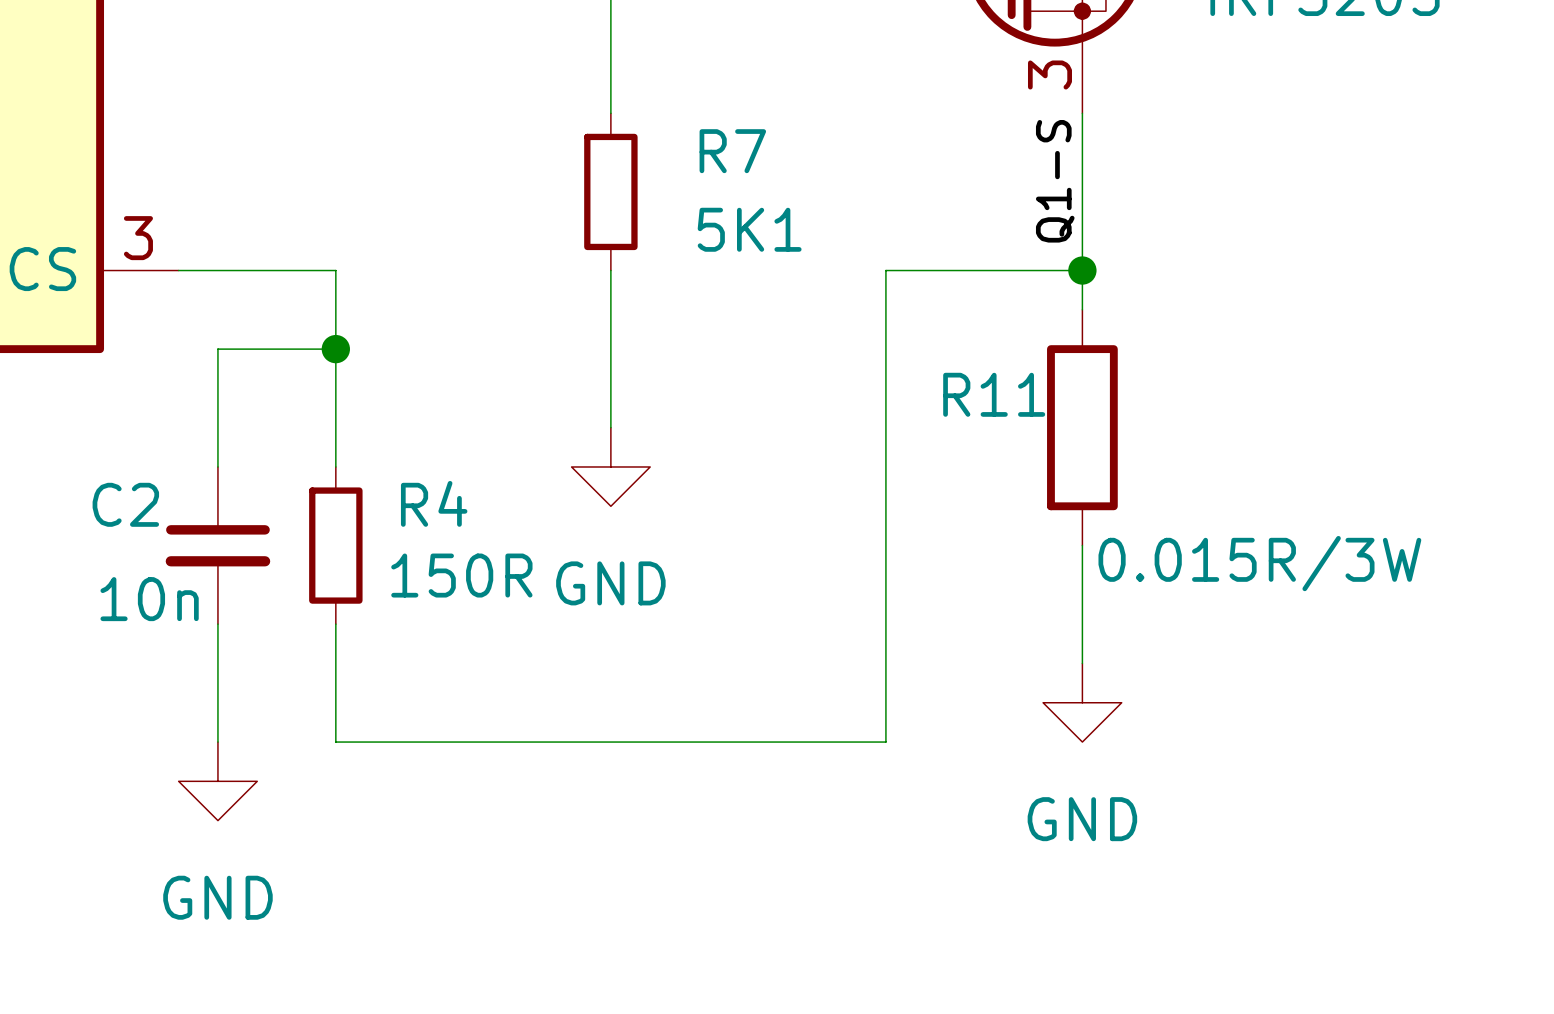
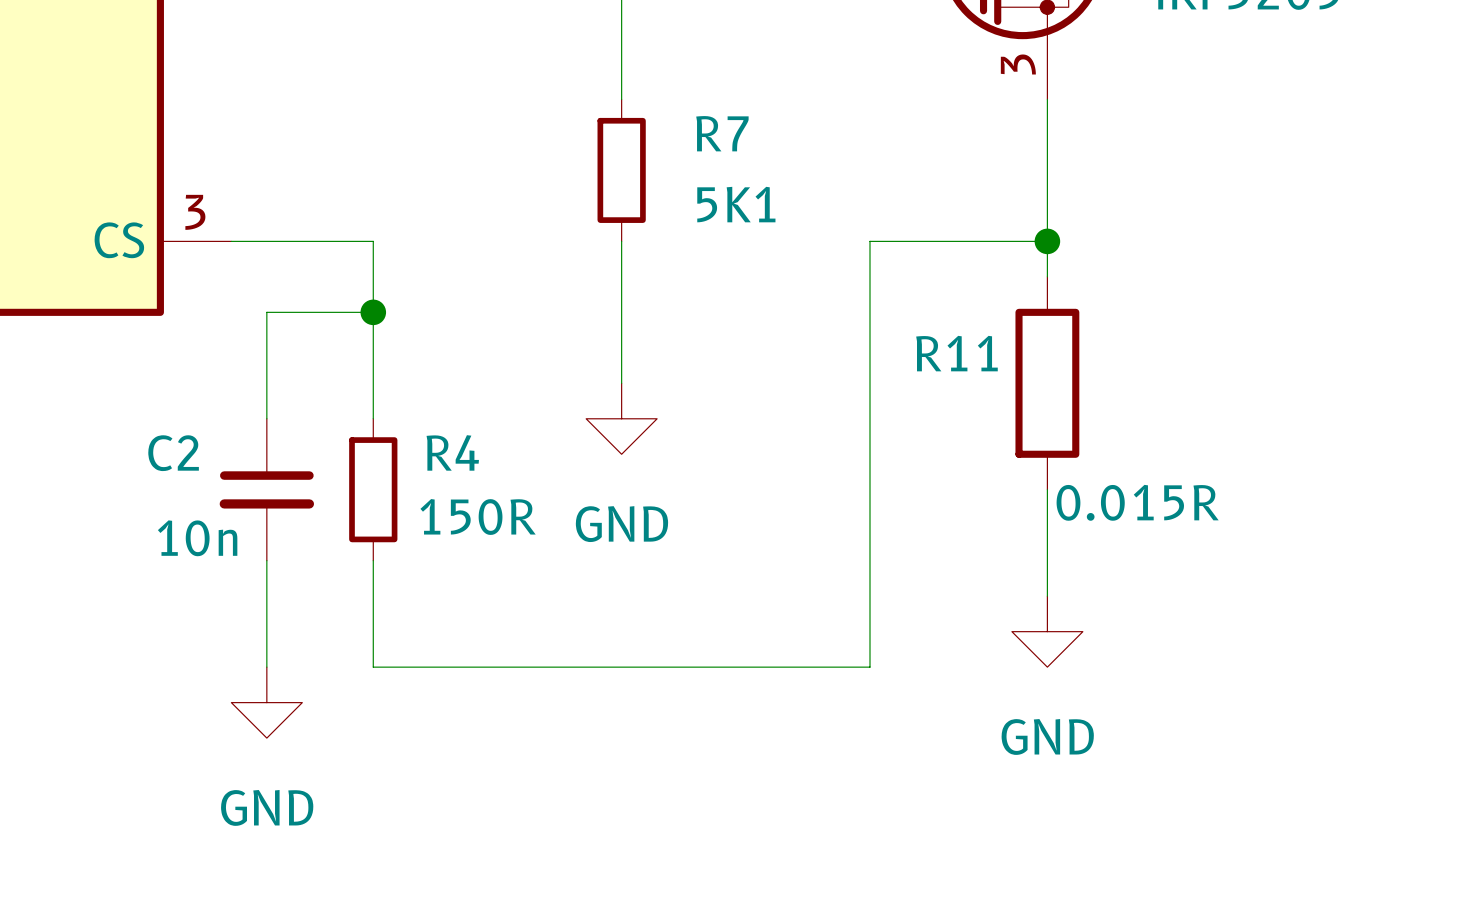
label: Q1-S (1055, 181) -> none
R11 value: 0.015R/3W (1259, 563) -> 0.015R (1137, 502)

